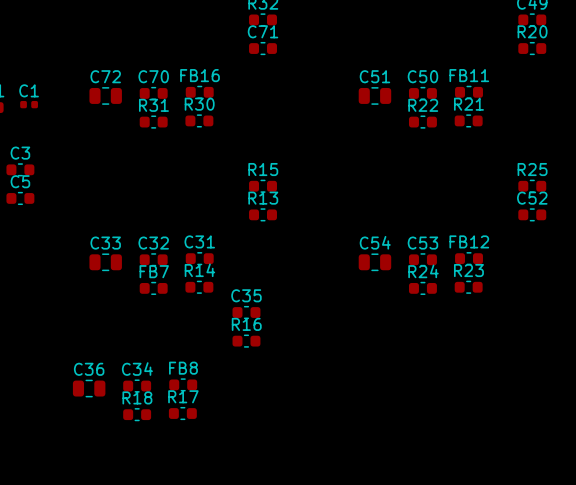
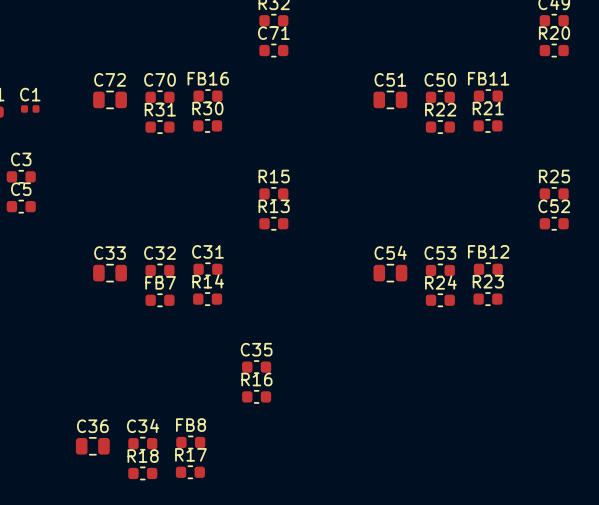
C35 position: (246, 312) -> (256, 367)
R16 position: (246, 341) -> (256, 396)
FB8 position: (183, 384) -> (190, 442)
C34 position: (137, 386) -> (142, 443)
C36 position: (89, 388) -> (92, 446)
R17 position: (182, 413) -> (190, 472)
R18 position: (137, 414) -> (142, 473)

